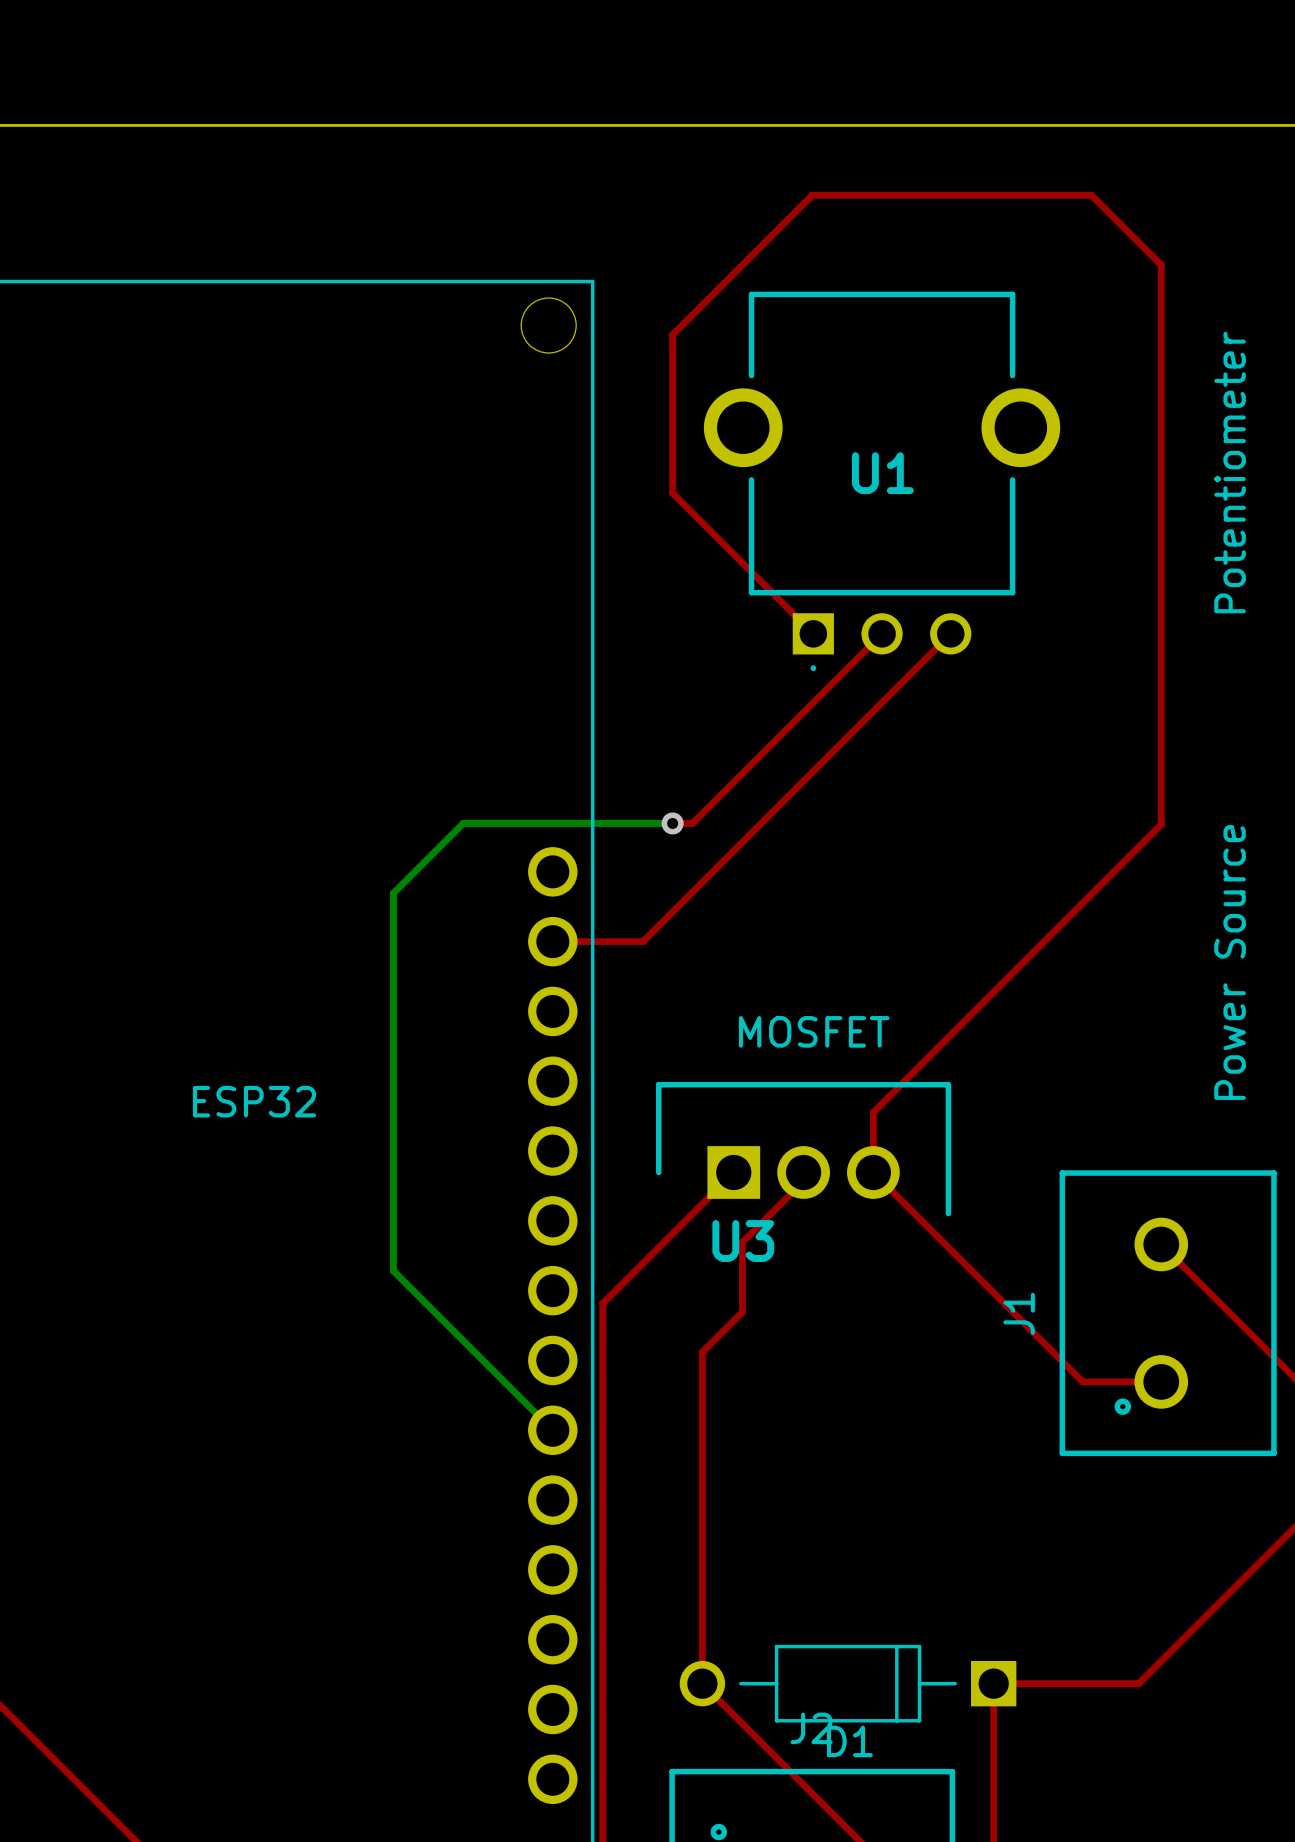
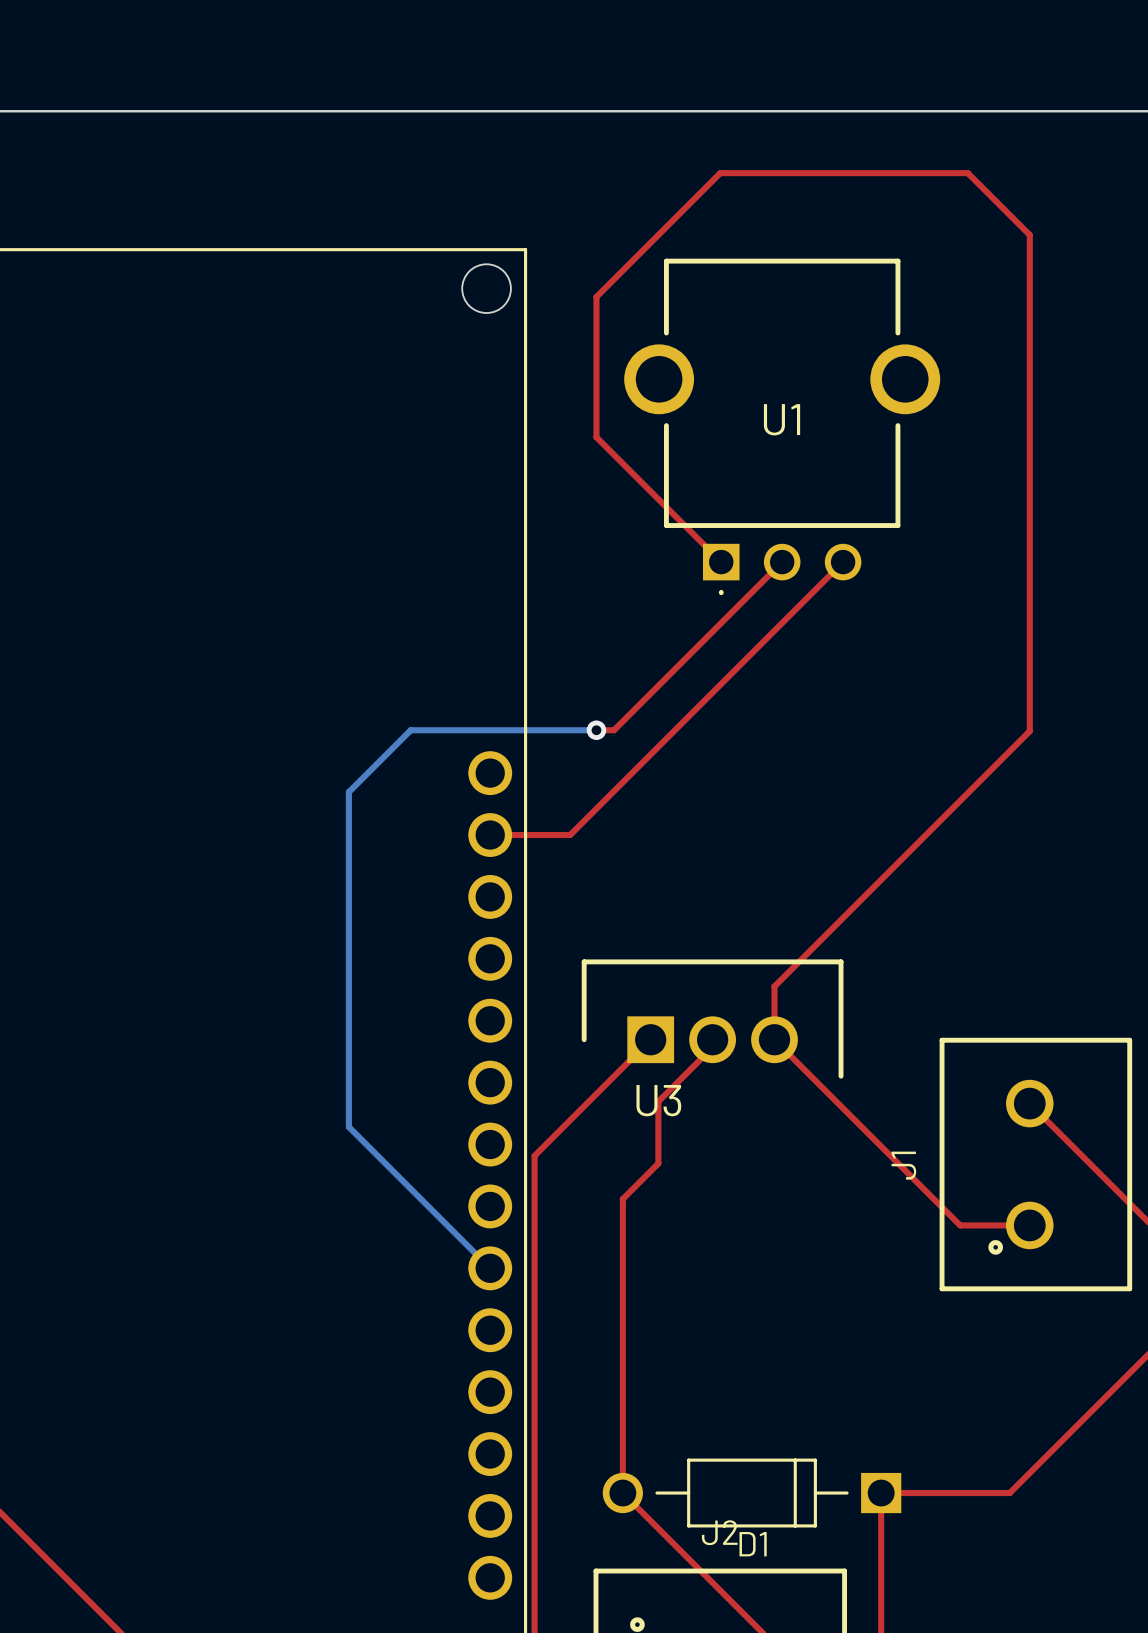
text: Potentiometer (1230, 472) -> none
text: Power Source (1230, 962) -> none
text: MOSFET (814, 1031) -> none
text: ESP32 (254, 1101) -> none

